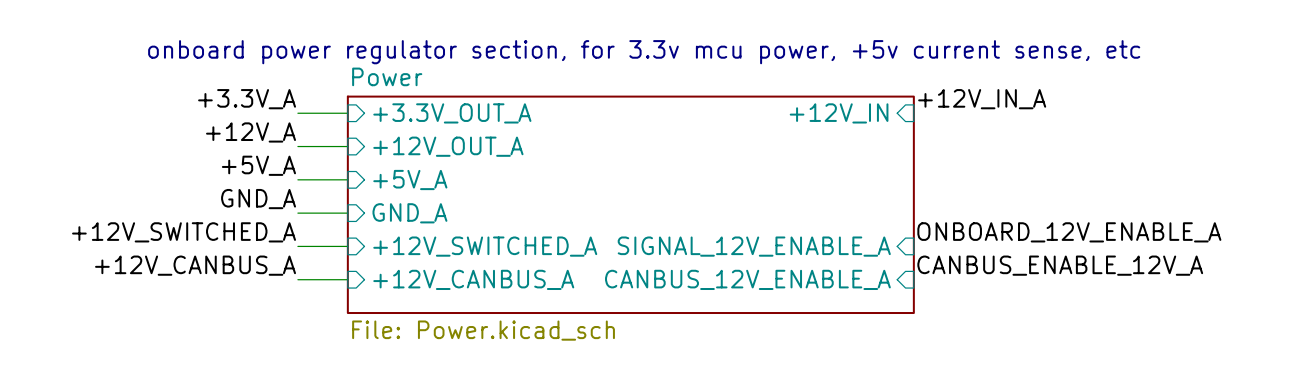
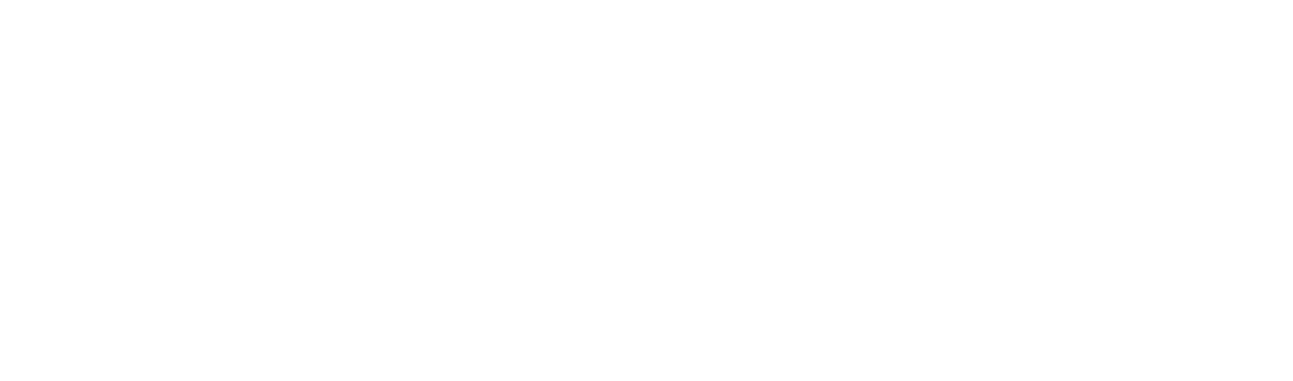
text: onboard power regulator section, for 3.3v mcu power, +5v current sense, etc (644, 52) -> none
label: +3.3V_A (247, 99) -> none
label: +12V_IN_A (982, 99) -> none
wire: (297, 113) (347, 113) -> none
sheet pin: +3.3V_OUT_A (452, 113) -> none
sheet pin: +12V_IN (839, 113) -> none
label: +12V_A (251, 132) -> none
wire: (297, 146) (347, 146) -> none
sheet pin: +12V_OUT_A (448, 146) -> none
label: +5V_A (258, 165) -> none
wire: (297, 179) (347, 179) -> none
sheet pin: +5V_A (410, 180) -> none
label: GND_A (258, 199) -> none
sheet Power: File: Power.kicad_sch (630, 204) -> none
wire: (297, 213) (347, 213) -> none
sheet pin: GND_A (409, 213) -> none
label: +12V_SWITCHED_A (184, 232) -> none
label: ONBOARD_12V_ENABLE_A (1069, 232) -> none
wire: (297, 246) (347, 246) -> none
sheet pin: +12V_SWITCHED_A (485, 246) -> none
sheet pin: SIGNAL_12V_ENABLE_A (754, 246) -> none
label: +12V_CANBUS_A (195, 265) -> none
label: CANBUS_ENABLE_12V_A (1060, 265) -> none
wire: (297, 279) (347, 279) -> none
sheet pin: +12V_CANBUS_A (473, 279) -> none
sheet pin: CANBUS_12V_ENABLE_A (747, 279) -> none

